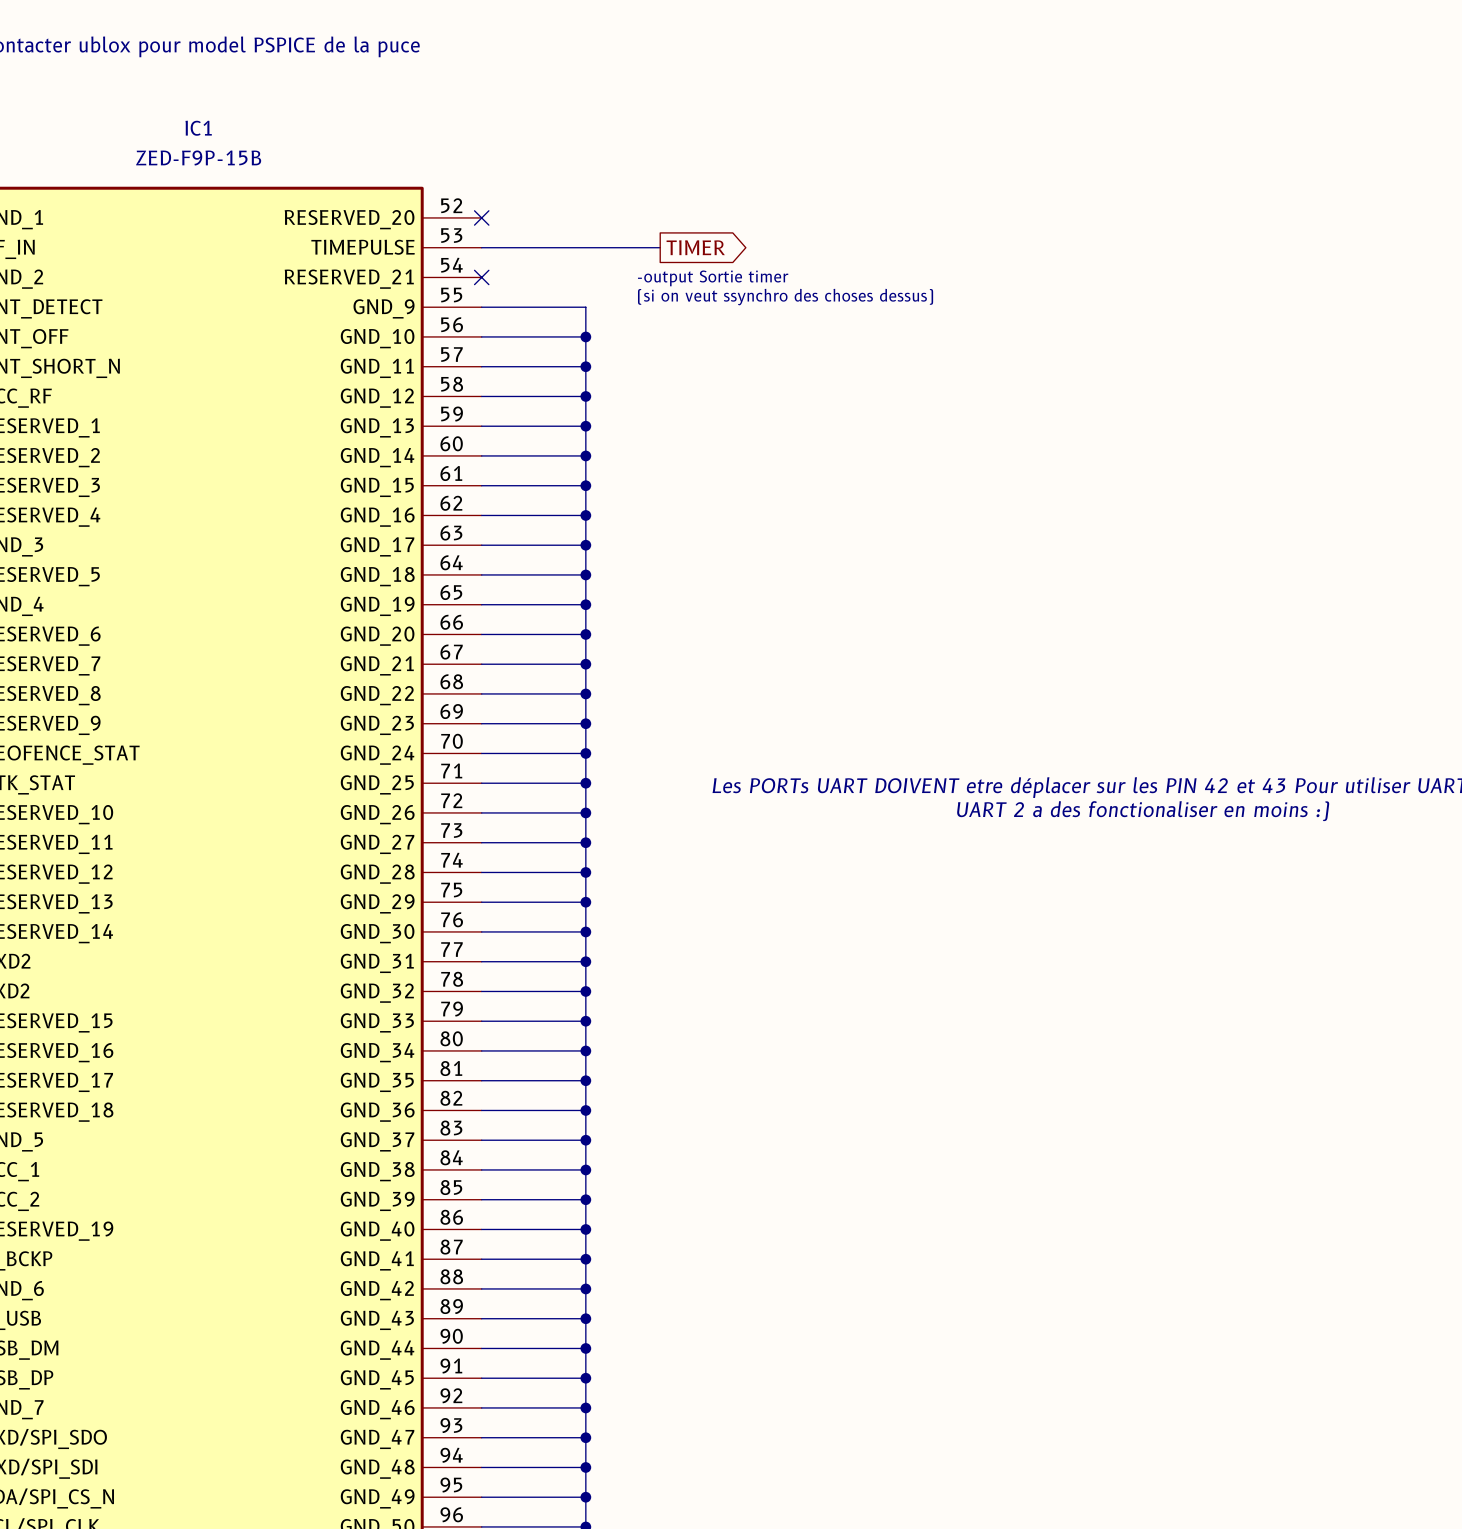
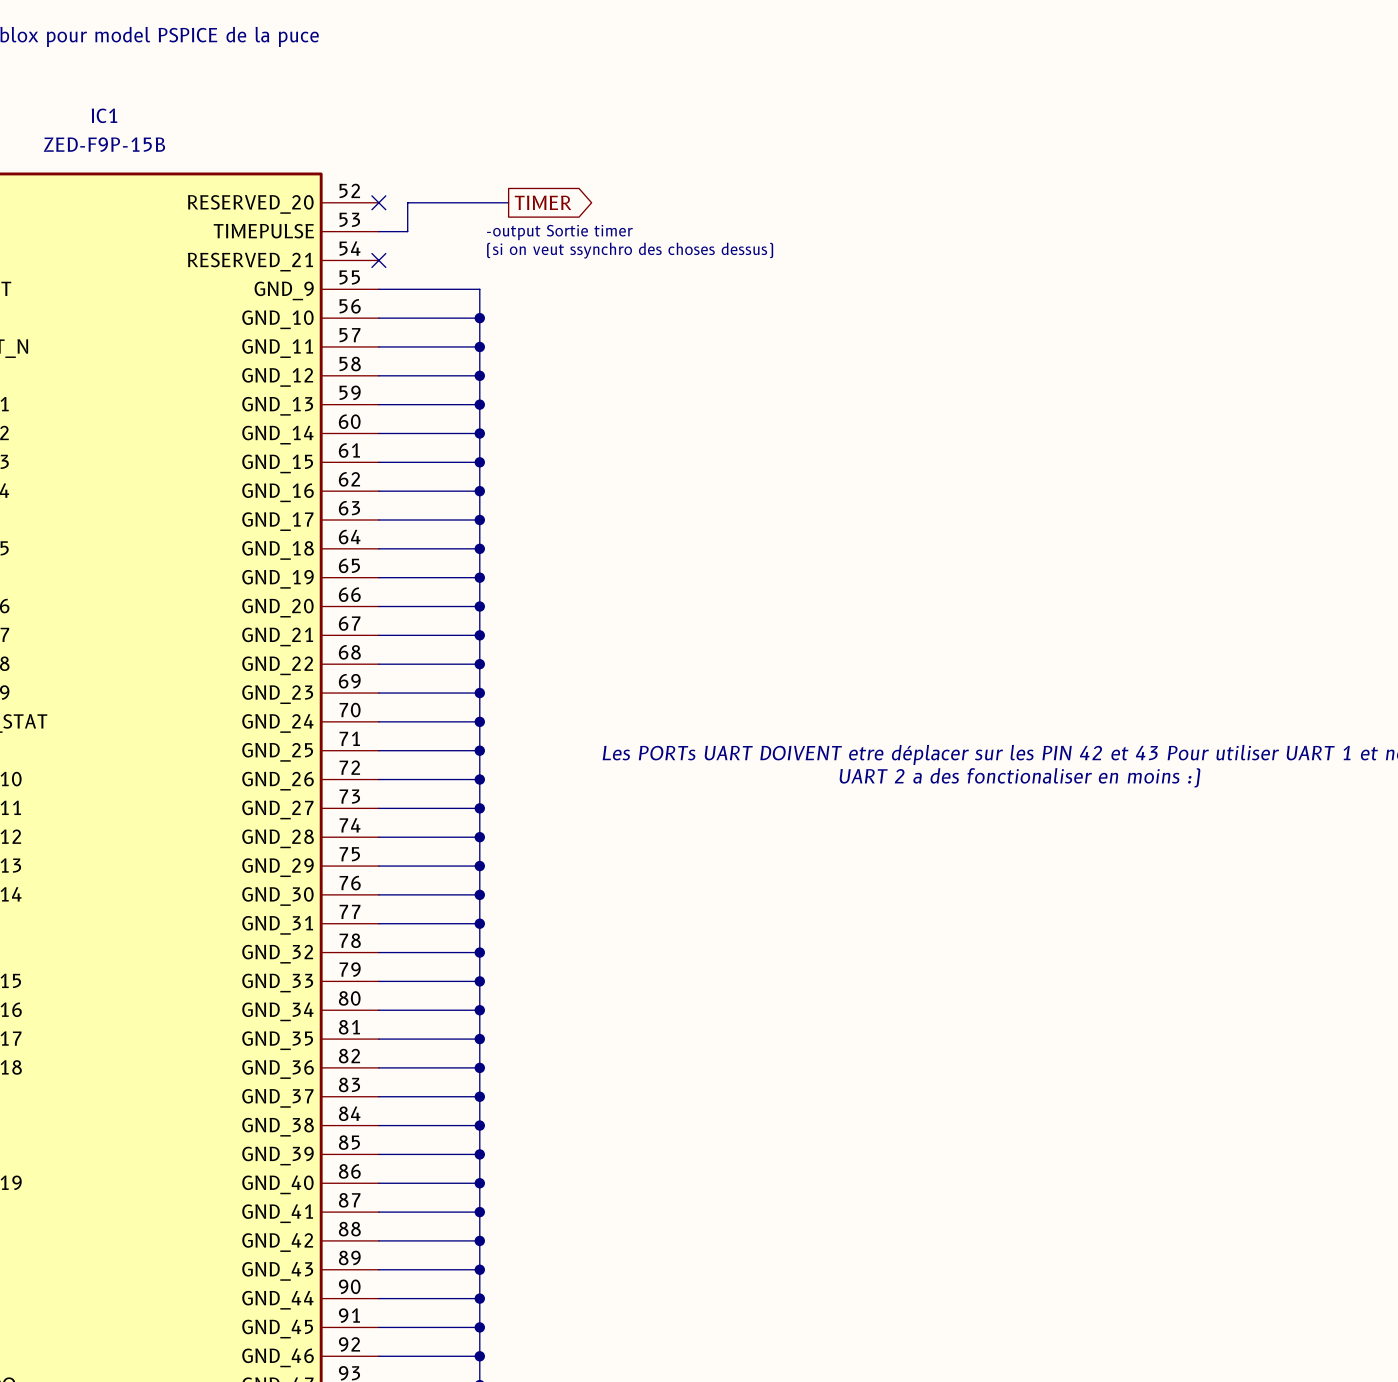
wire: (511, 247) (660, 247) -> (407, 231) (407, 202) (508, 202)
global label position: TIMER (695, 247) -> TIMER (543, 202)
text position: -output Sortie timer (713, 278) -> -output Sortie timer (559, 232)
text position: (si on veut ssynchro des choses dessus) (785, 297) -> (si on veut ssynchro des choses dessus) (630, 250)

